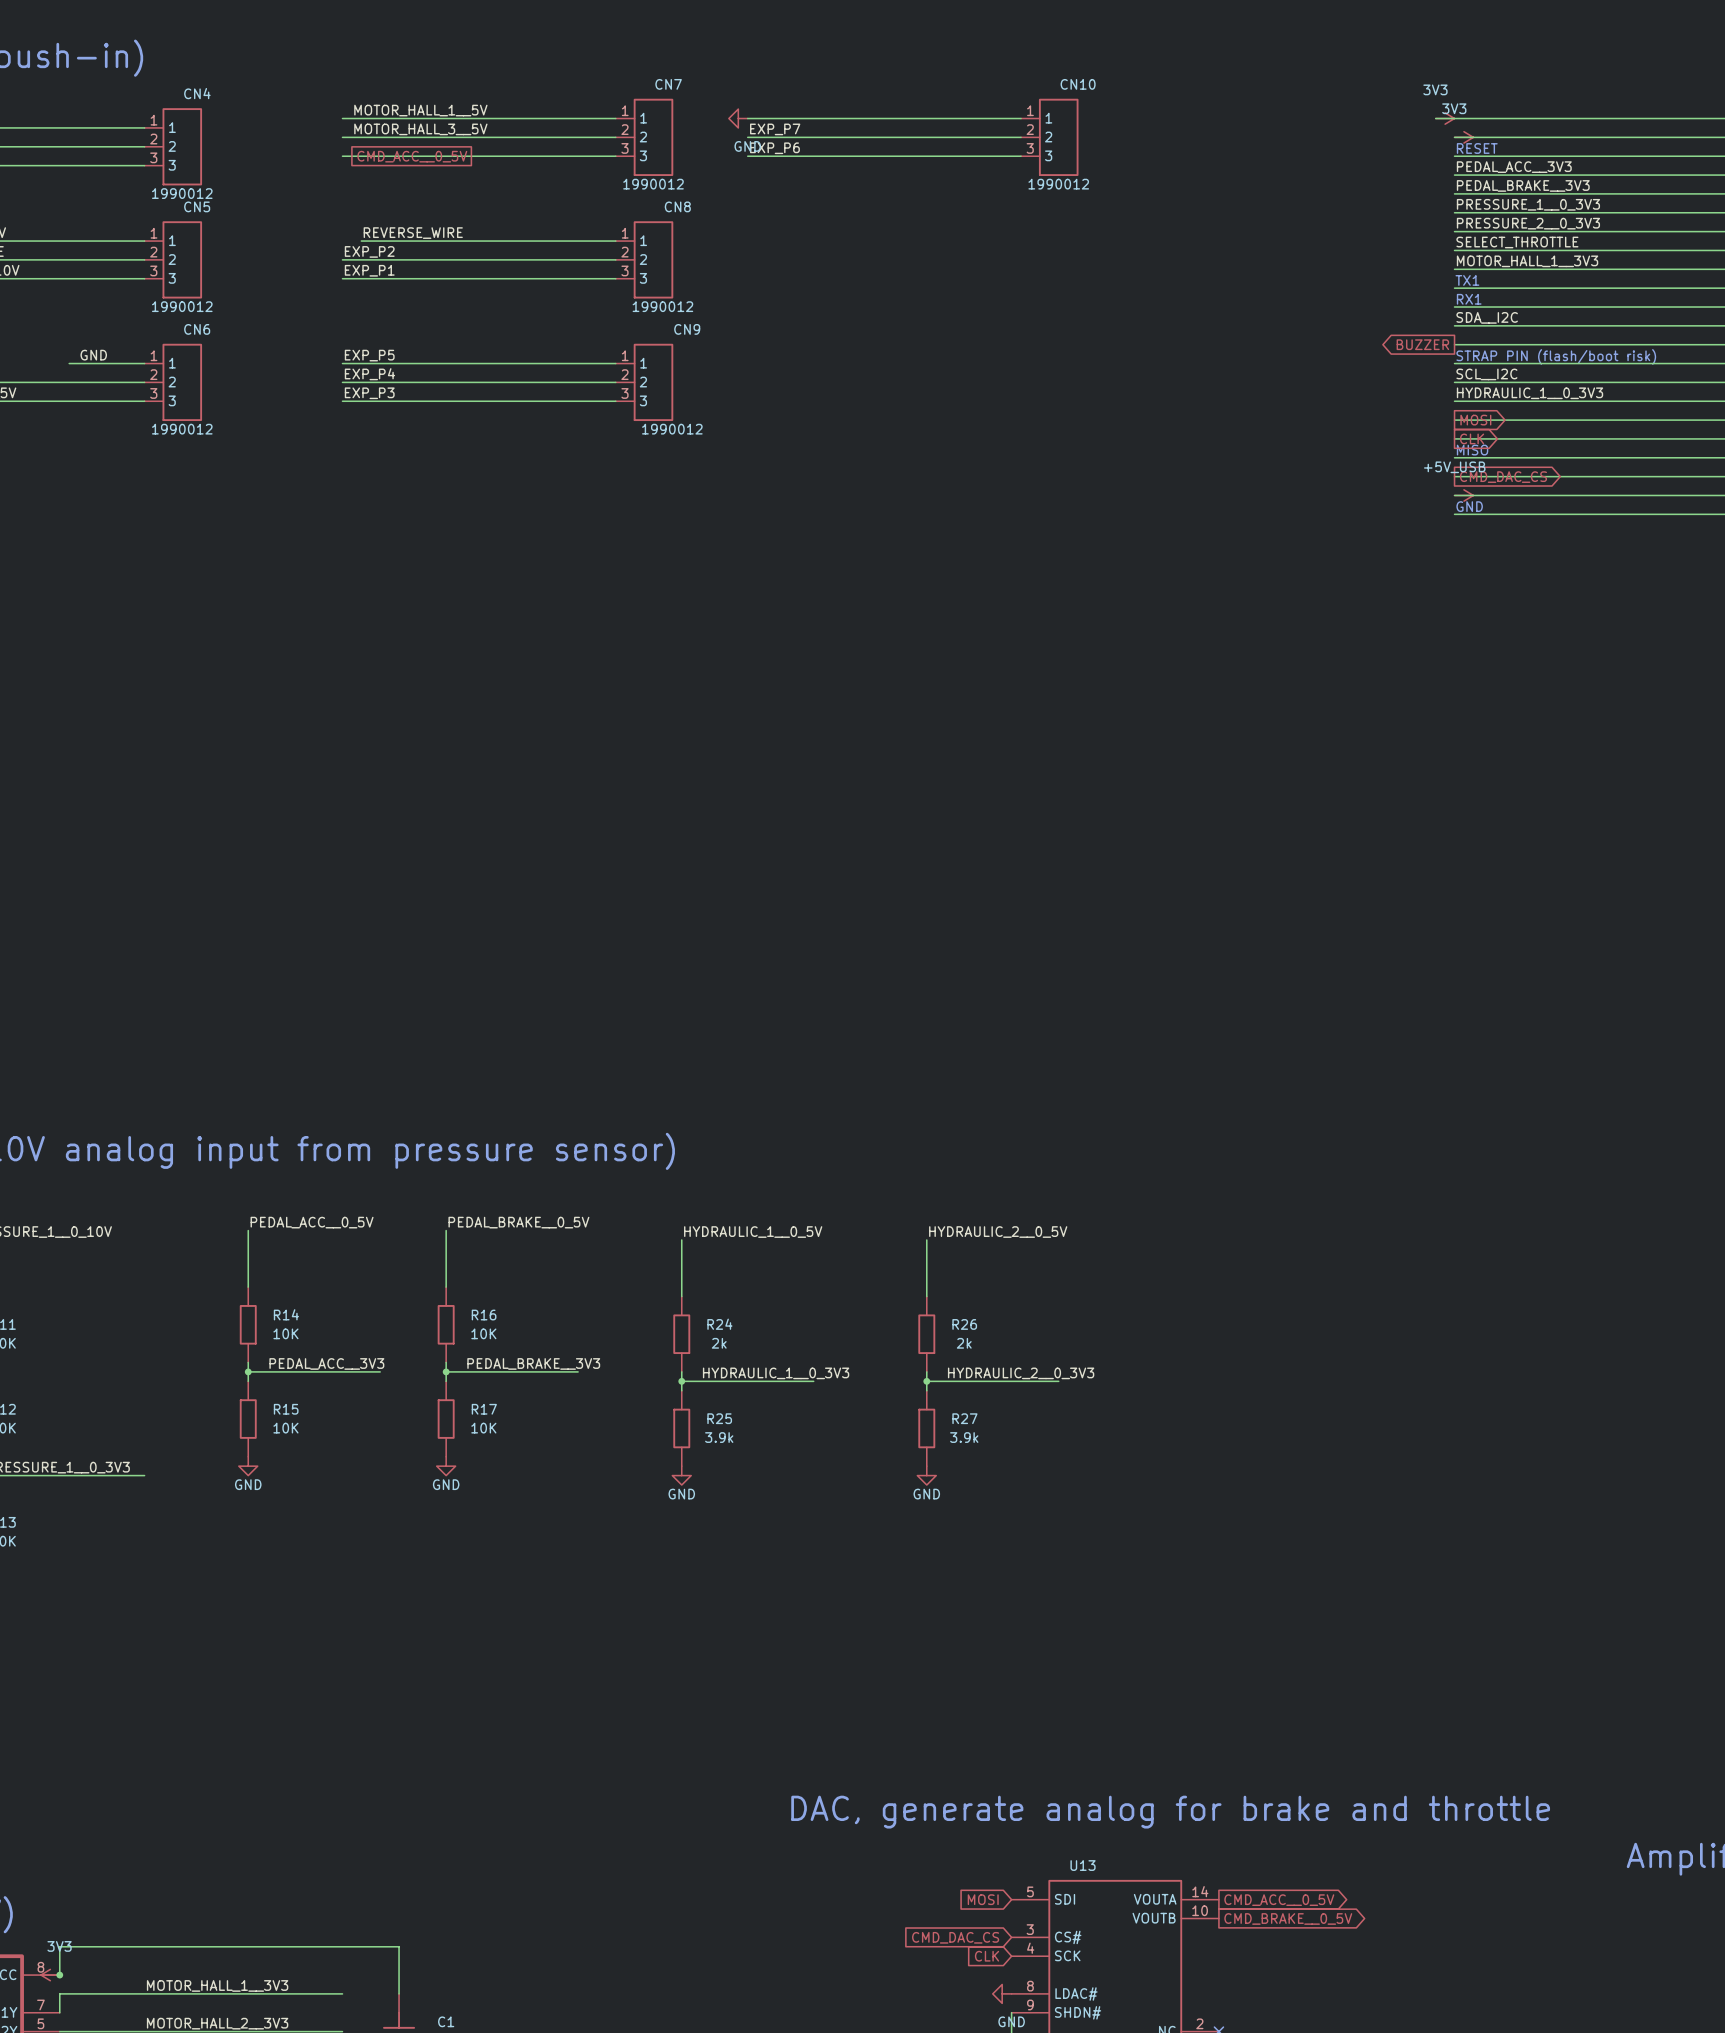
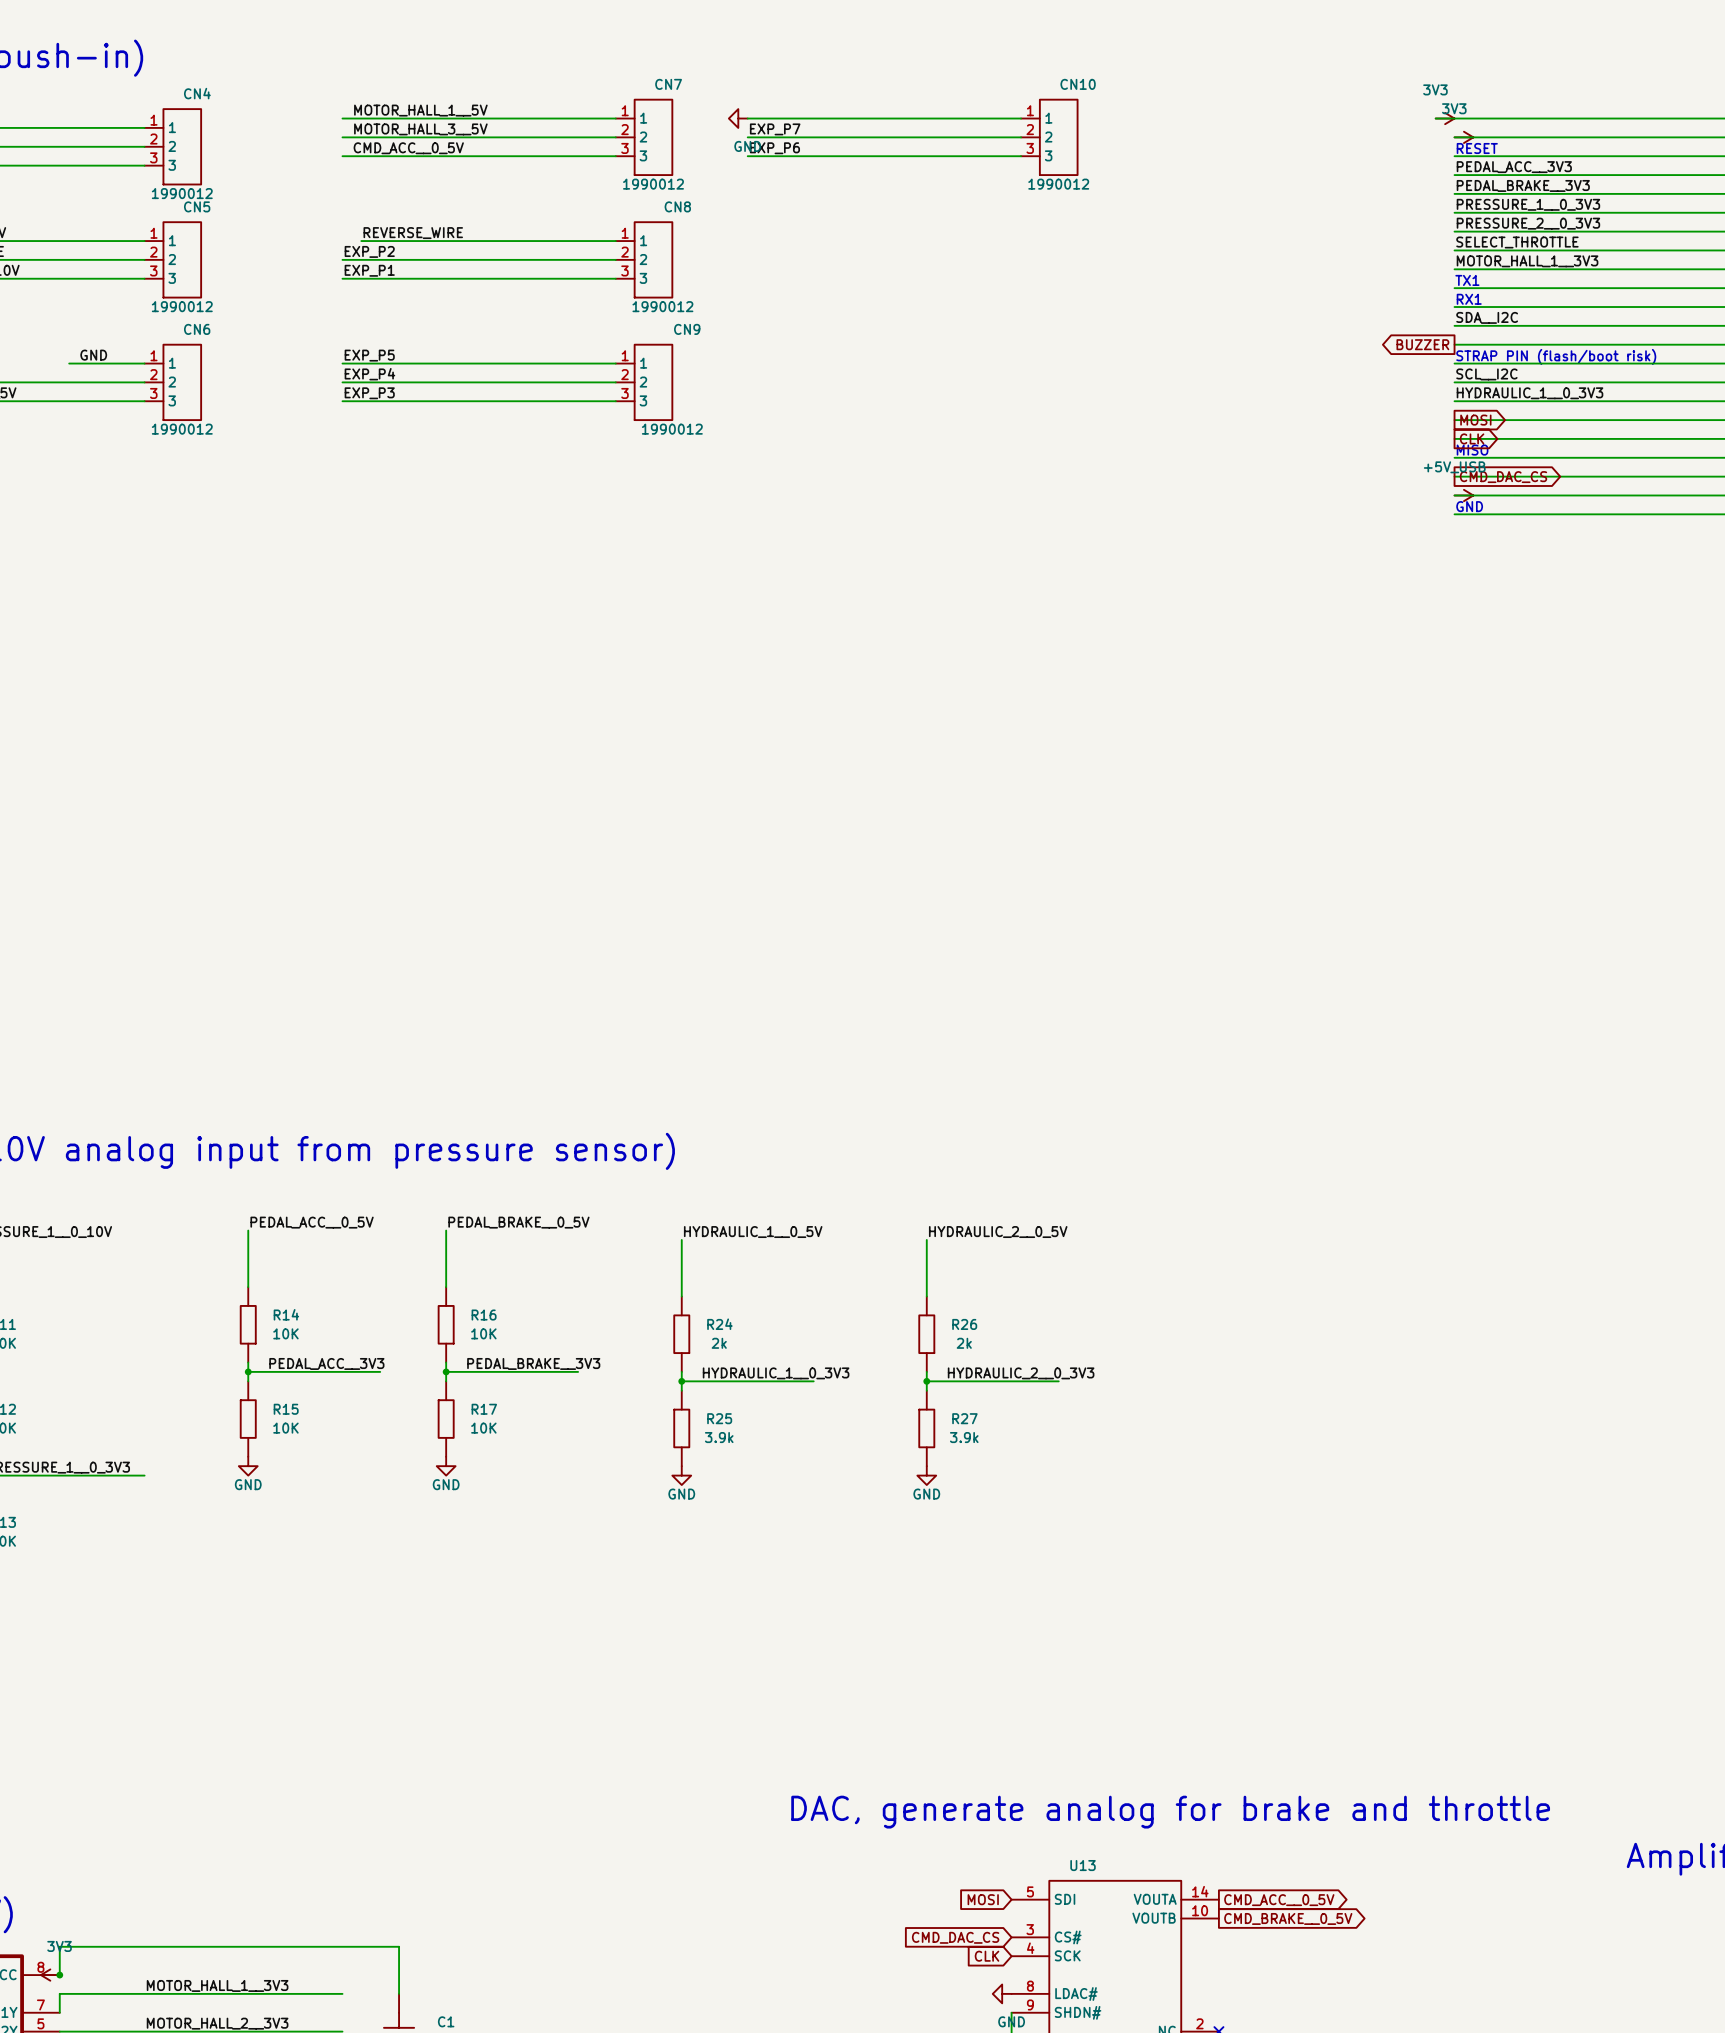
label: none -> CMD_ACC__0_5V (408, 148)
global label: CMD_ACC__0_5V (412, 156) -> none

